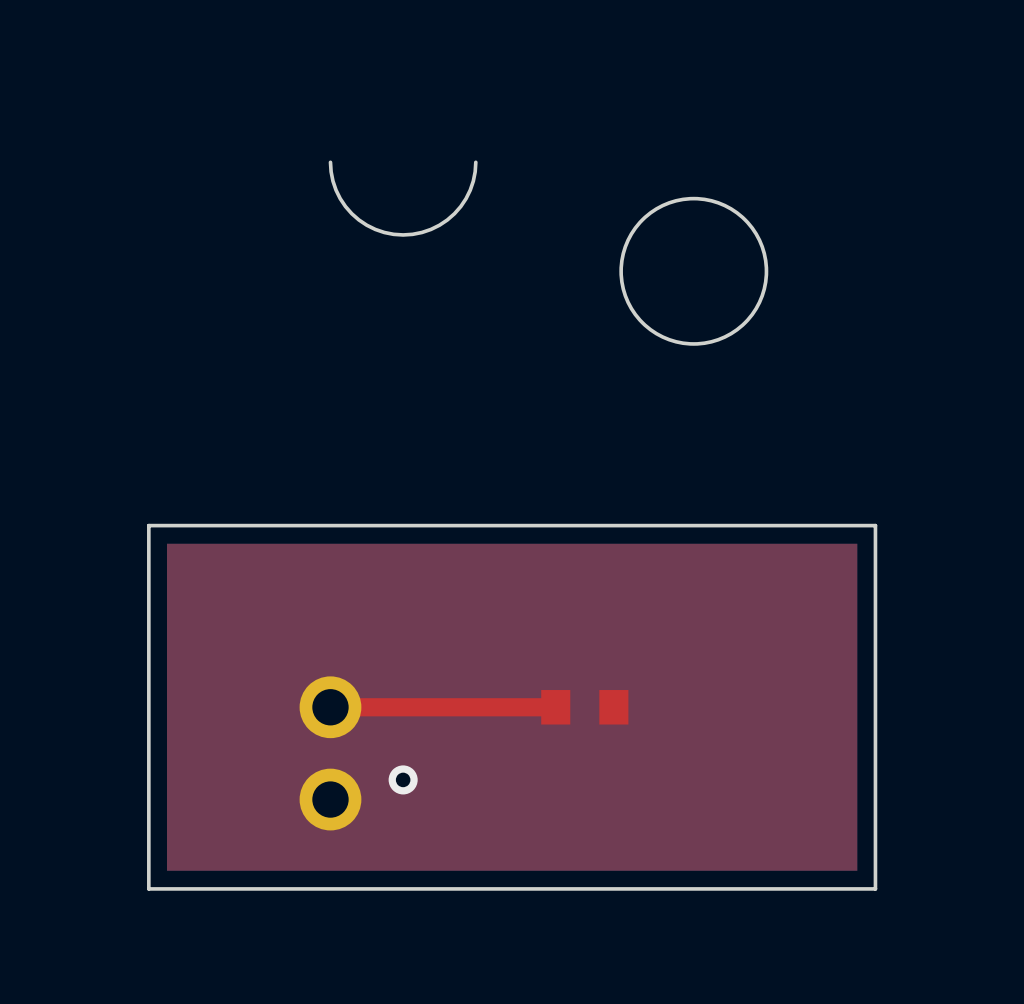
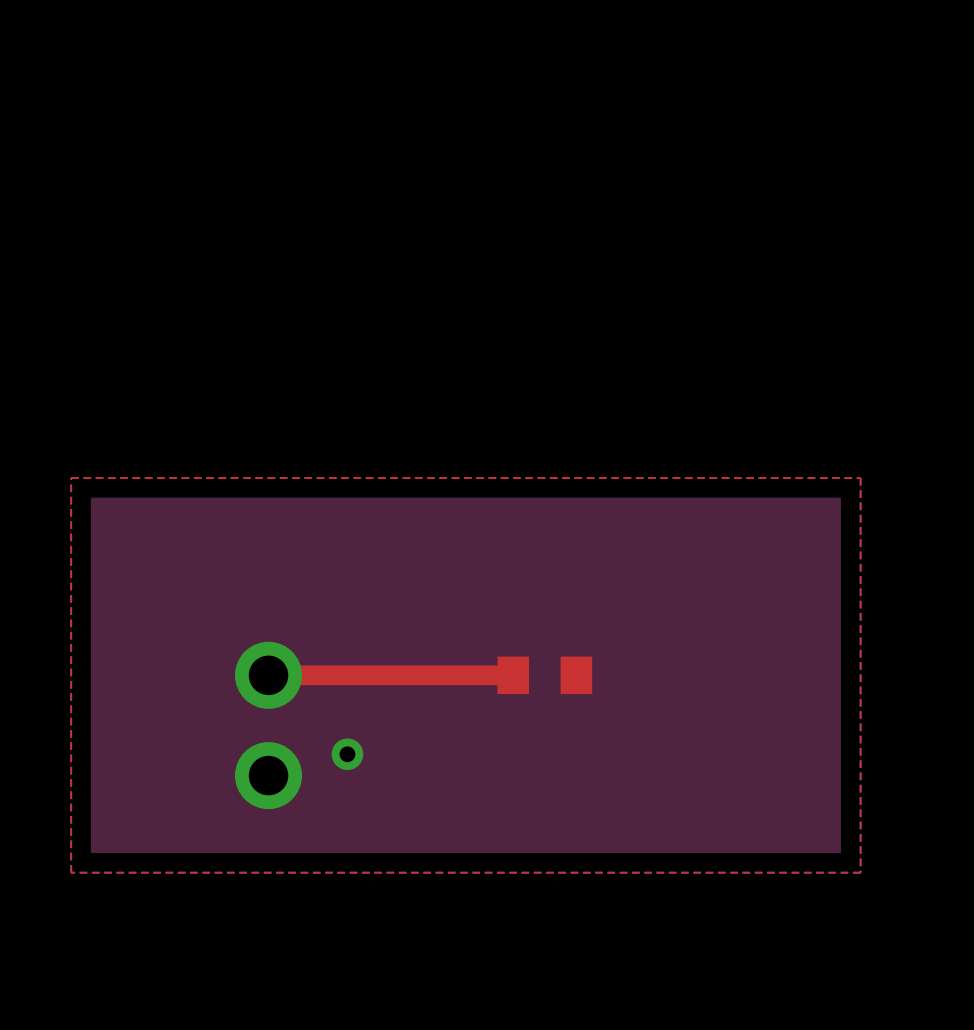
board edge: (330, 162) (336, 190) (351, 213) (375, 229) (403, 234) (430, 229) (454, 213) (470, 190) (475, 162) -> none
round board edge: [619, 196, 769, 346] -> none
board edge: (148, 525) (875, 525) (875, 888) (148, 888) (148, 525) -> none

